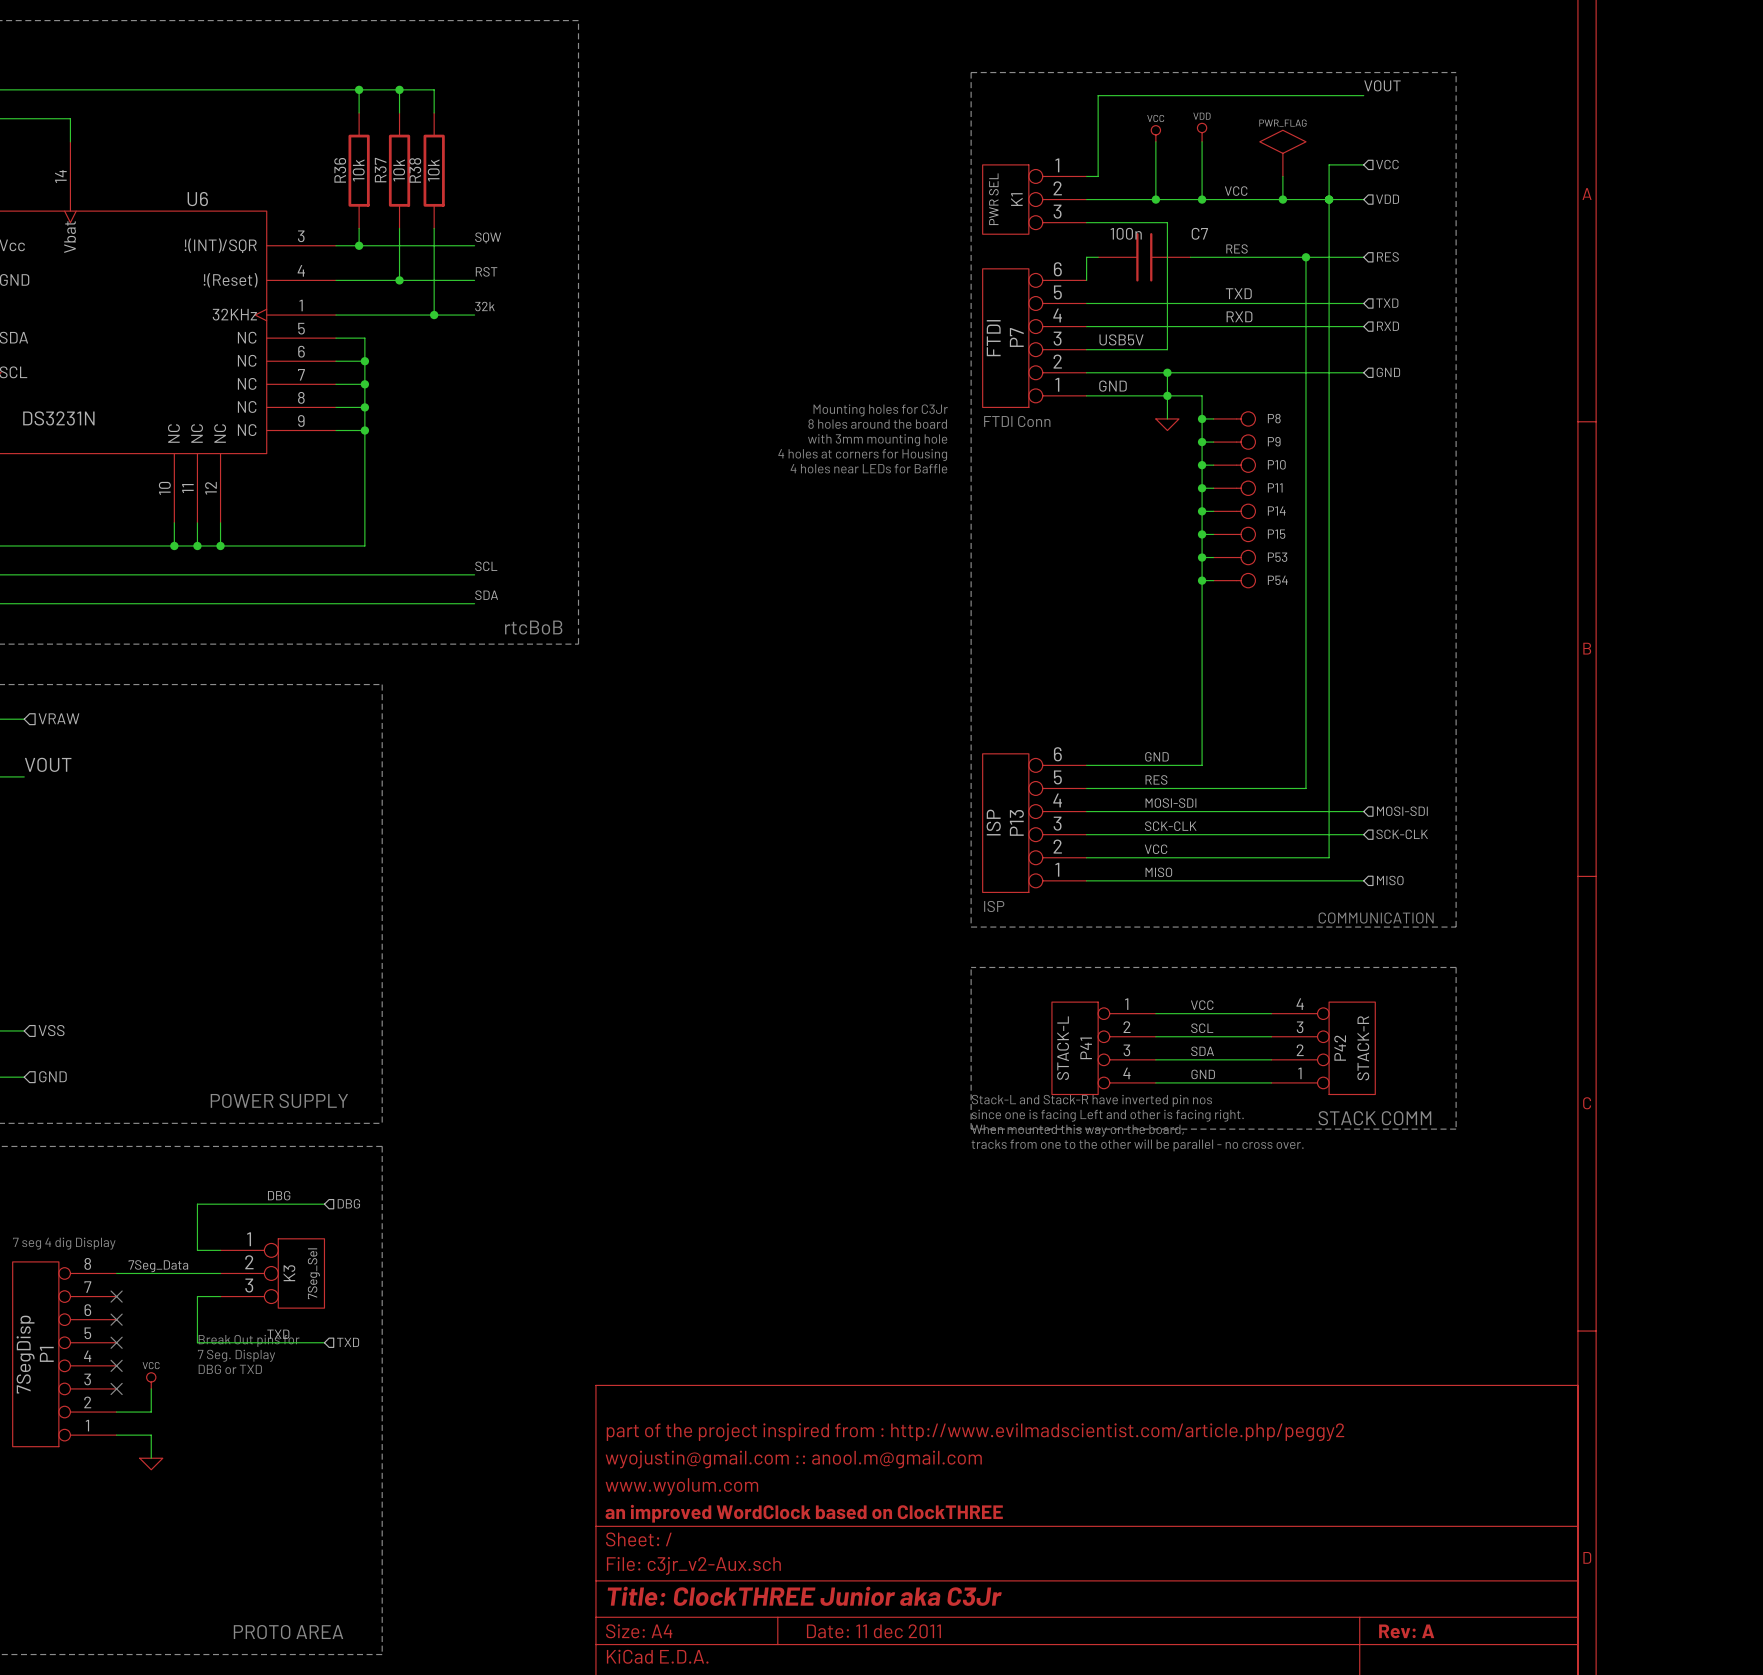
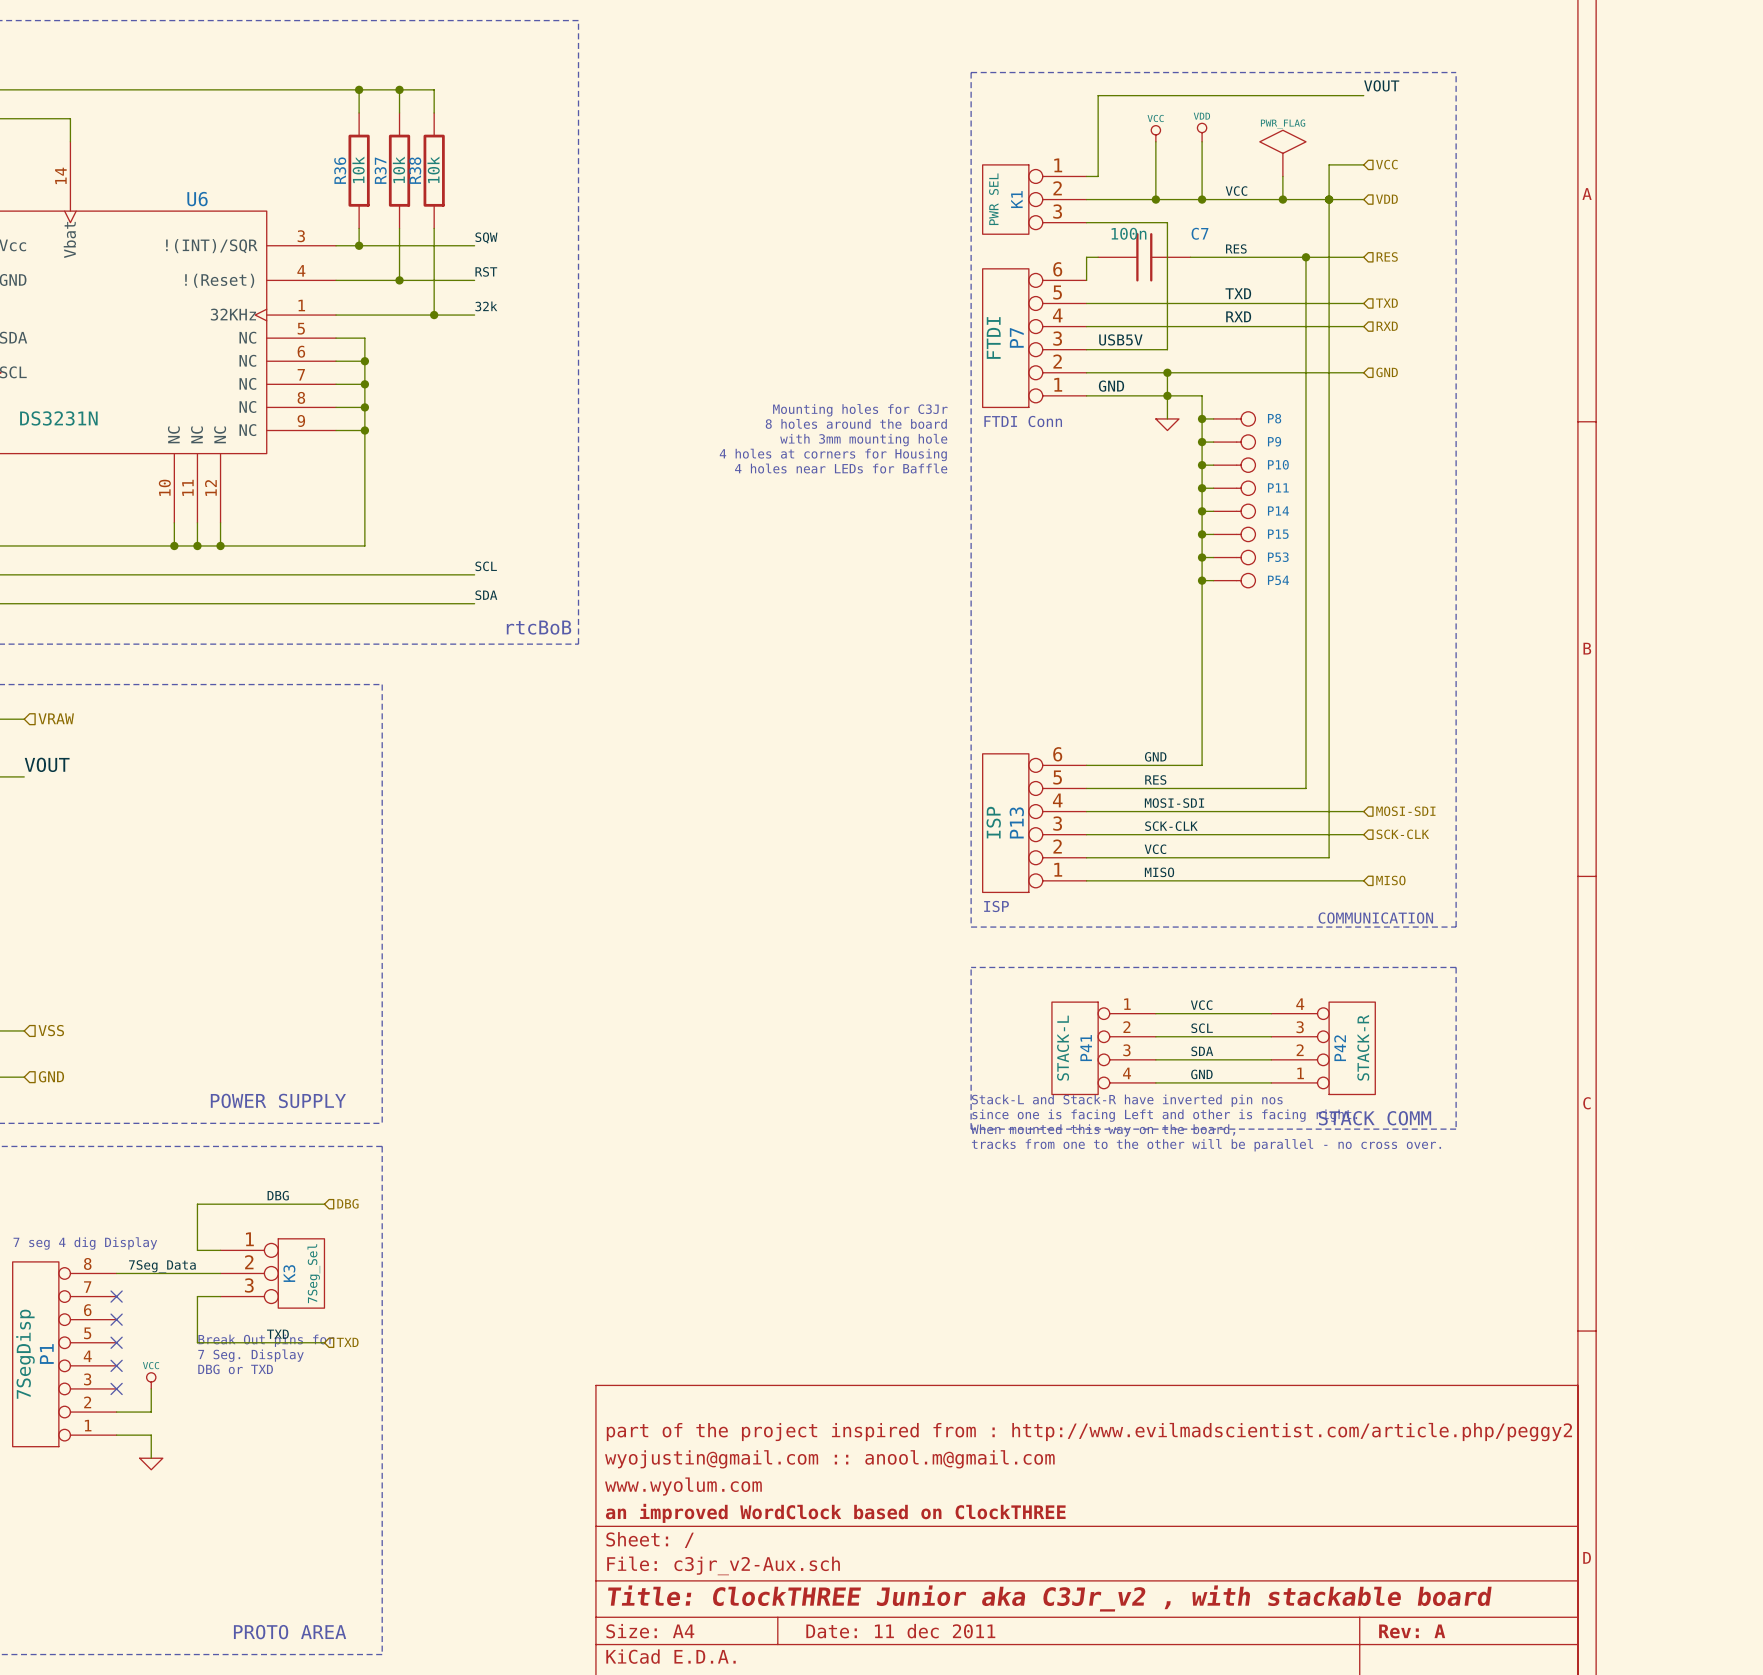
title block: Title: ClockTHREE Junior aka C3Jr (804, 1596) -> Title: ClockTHREE Junior aka C3Jr_v2 , with stackable board (1049, 1598)

